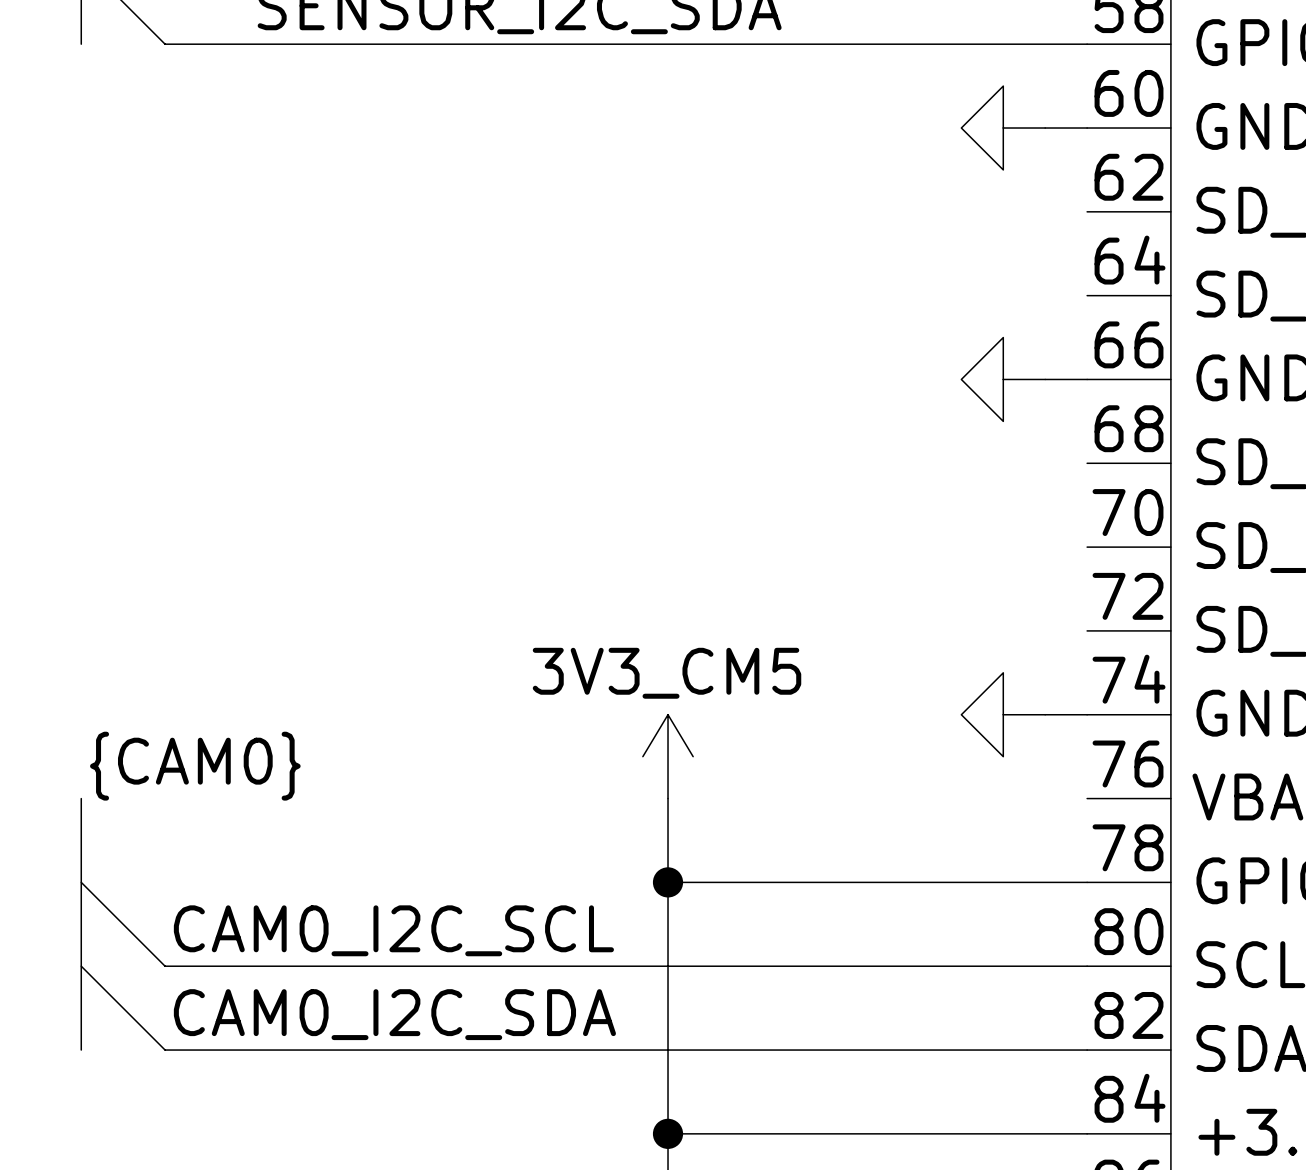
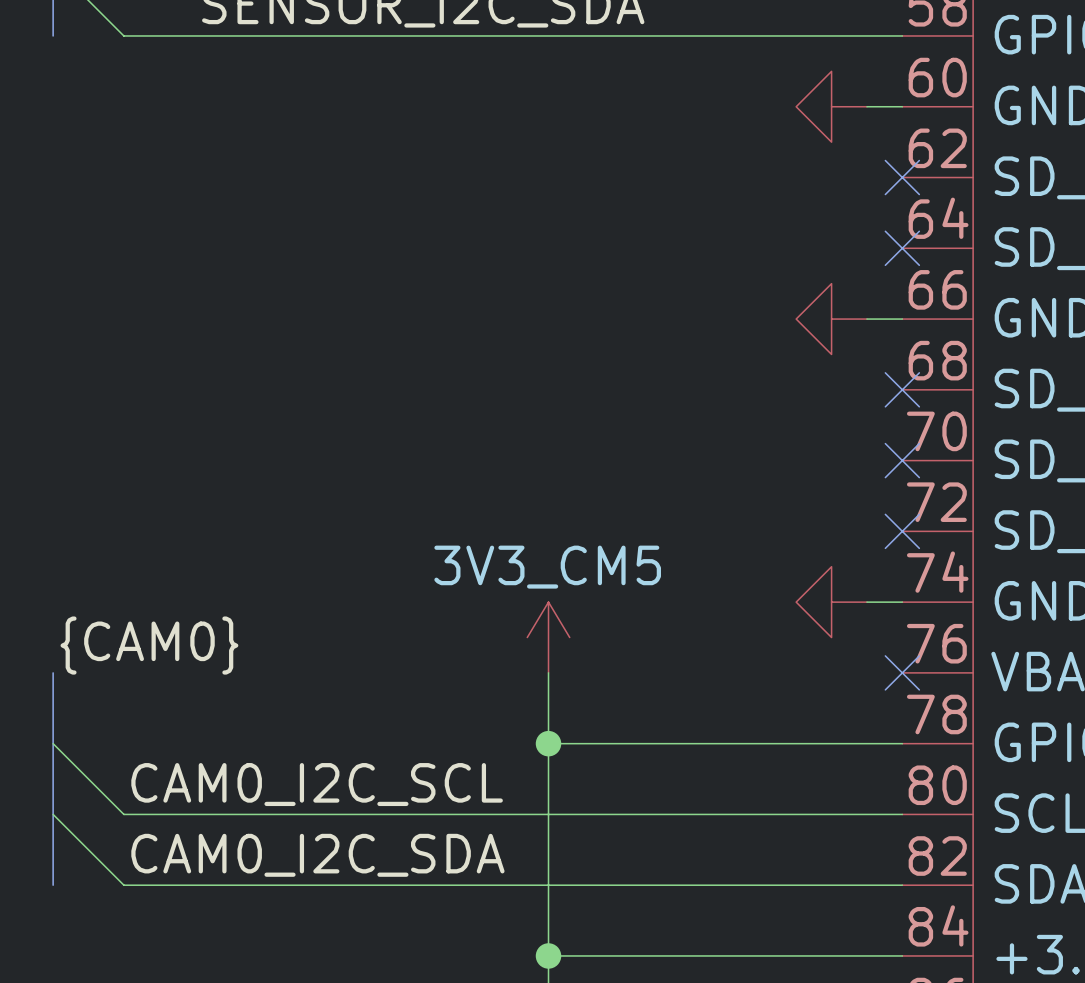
no-connect mark: none -> (902, 177)
no-connect mark: none -> (902, 248)
no-connect mark: none -> (902, 389)
no-connect mark: none -> (902, 460)
no-connect mark: none -> (902, 531)
no-connect mark: none -> (902, 672)

